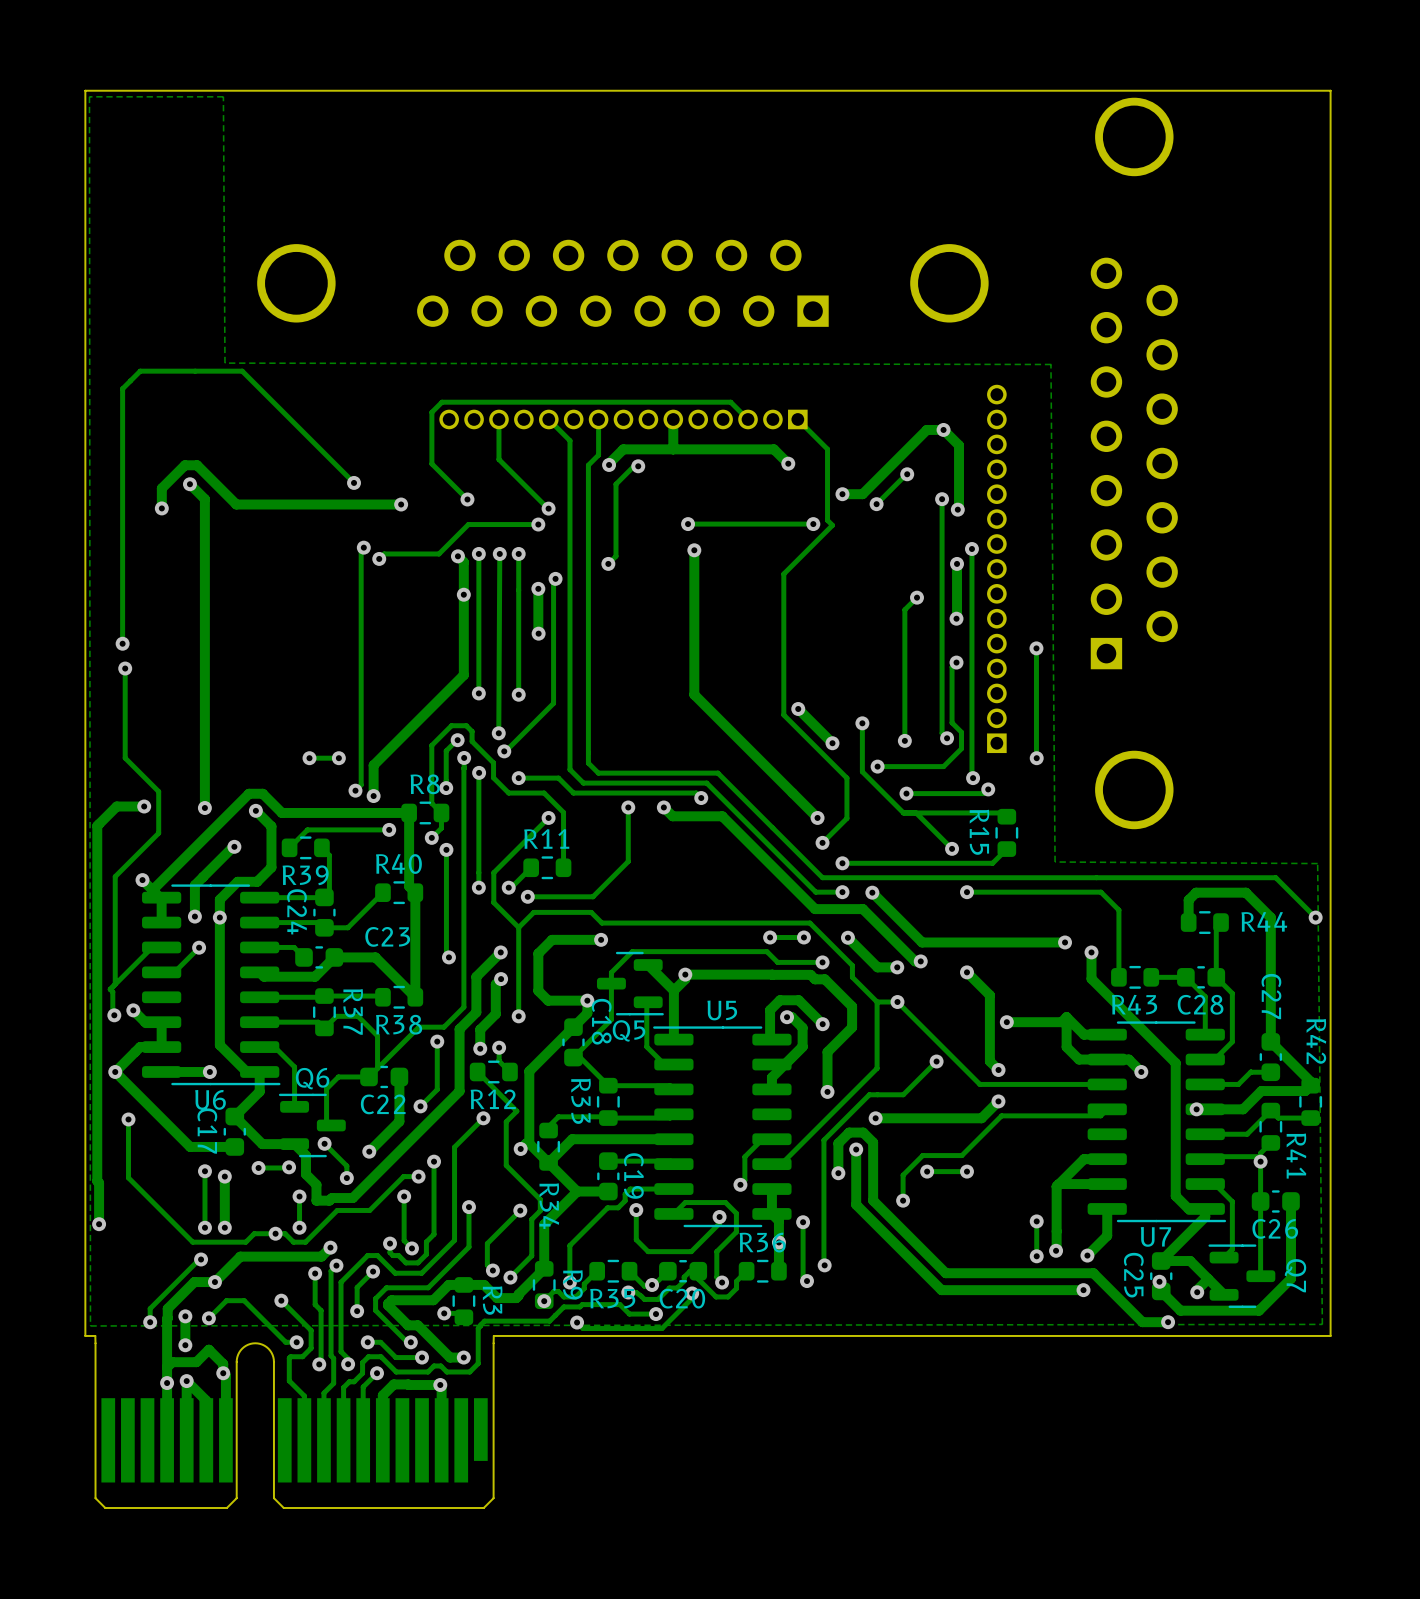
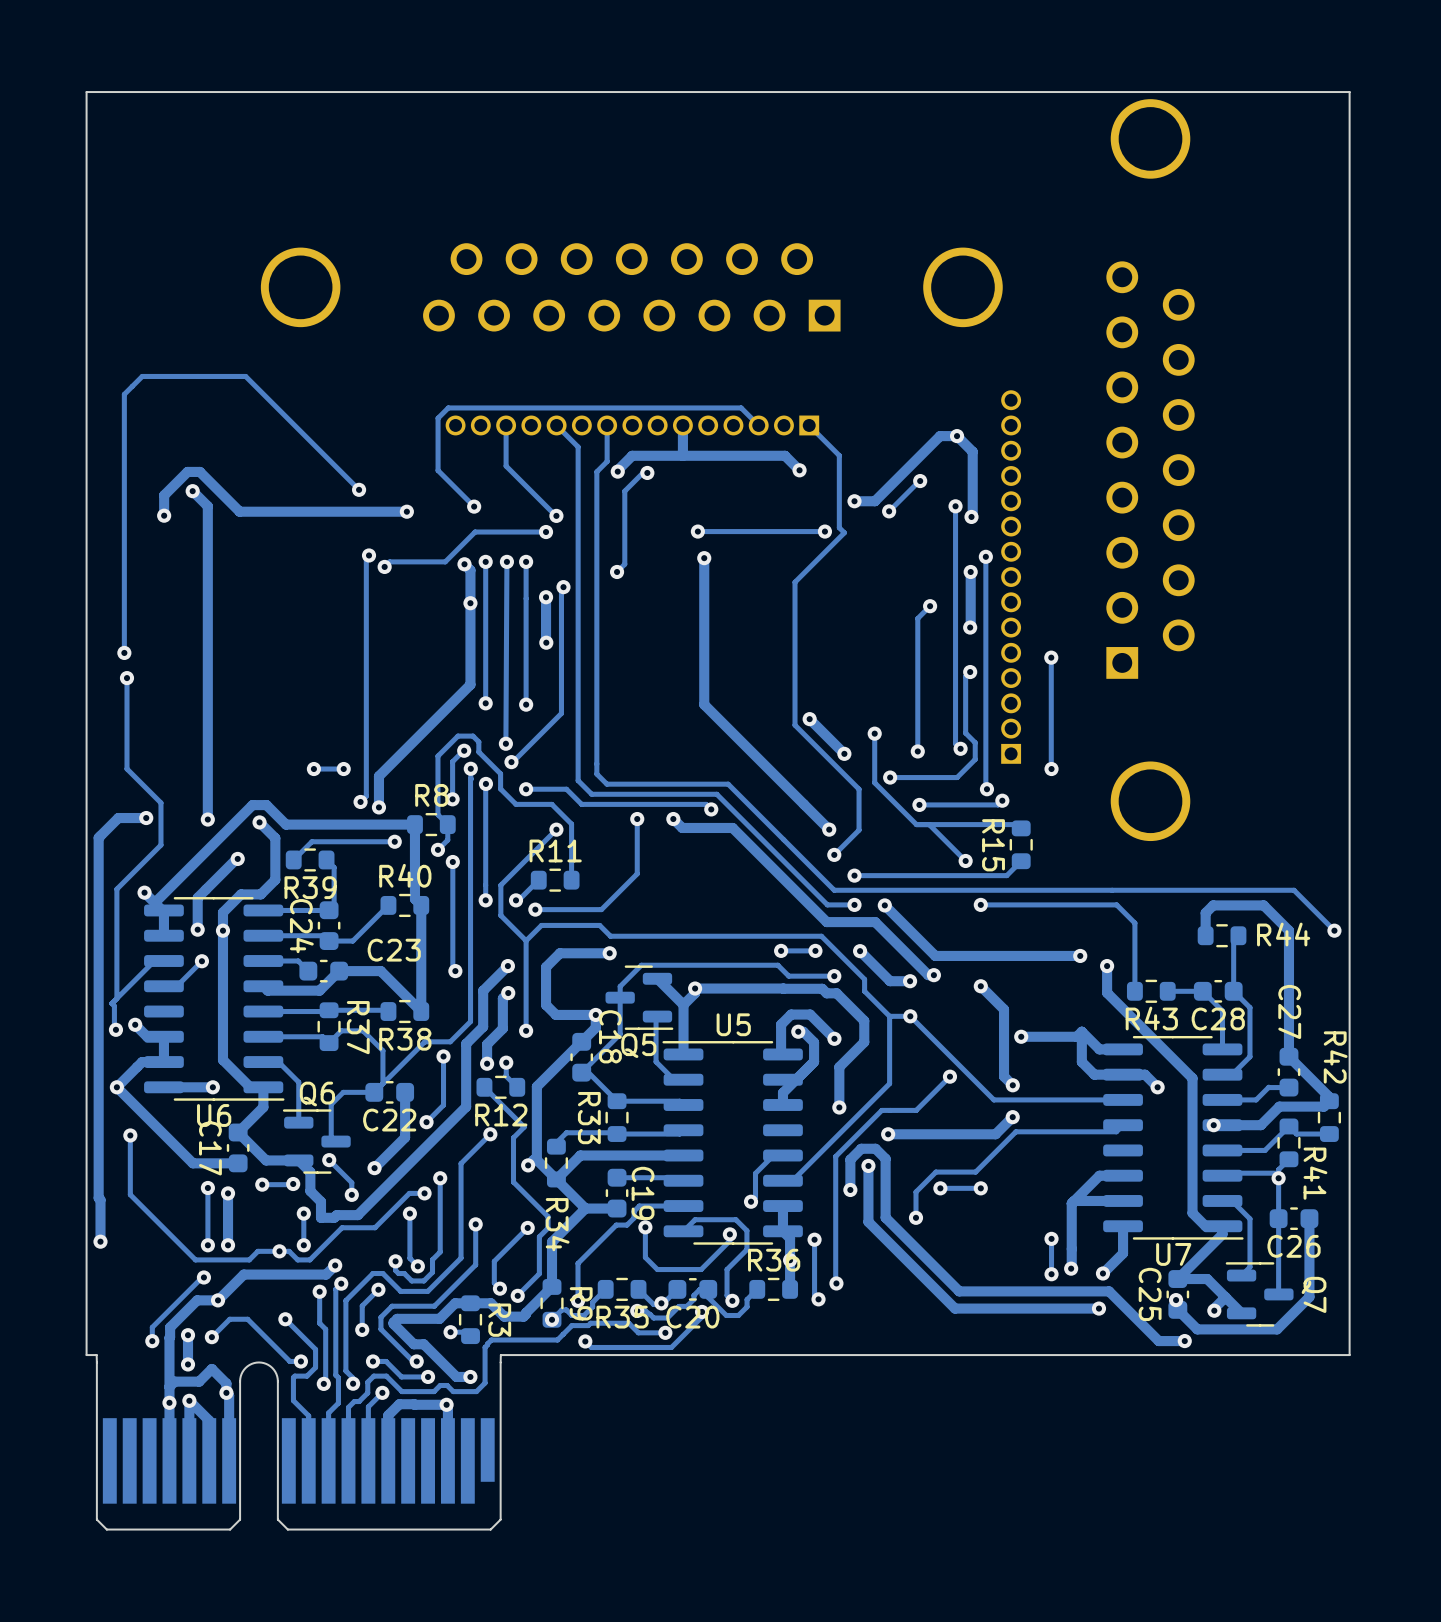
zone outline: (1051, 364) (224, 363) (223, 96) (89, 96) (90, 1325) (1322, 1324) (1317, 863) (1055, 862) (1050, 364) -> none

